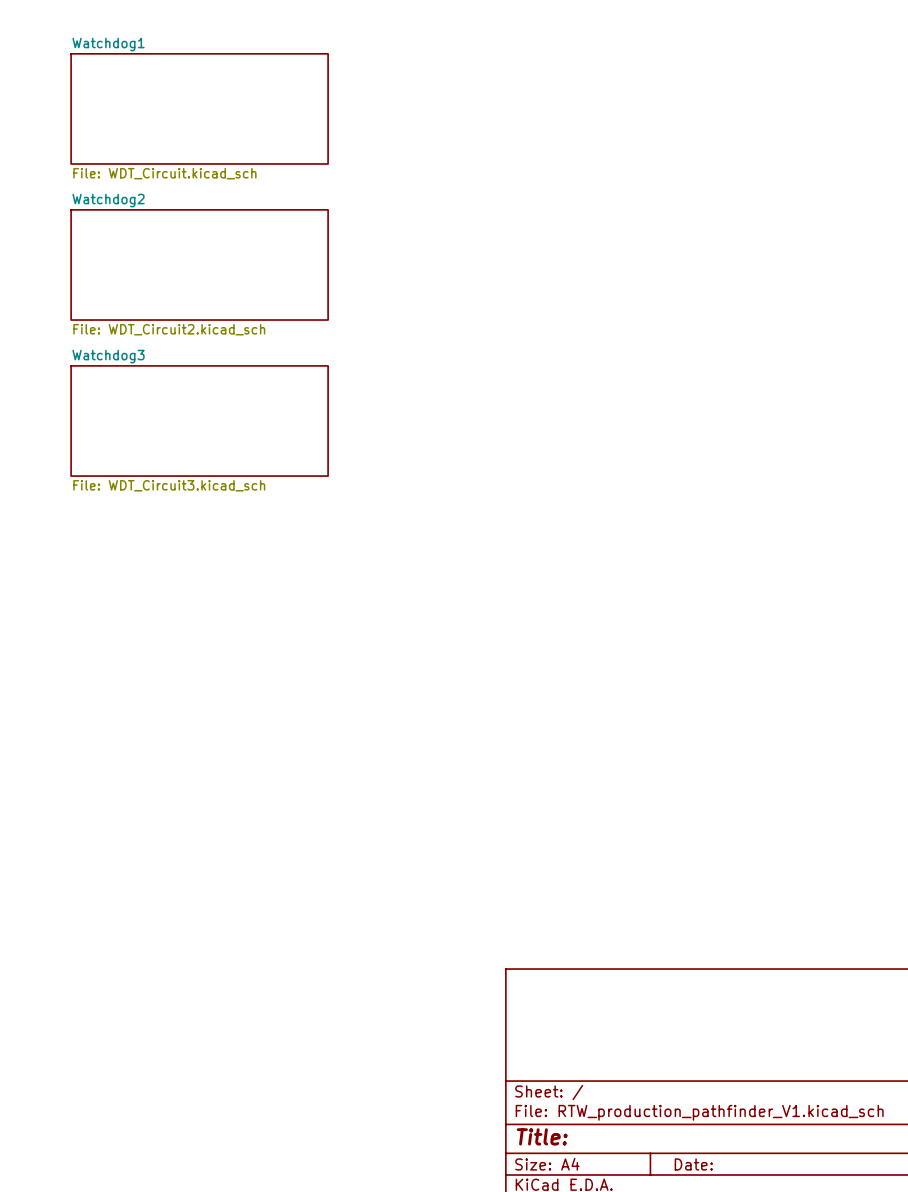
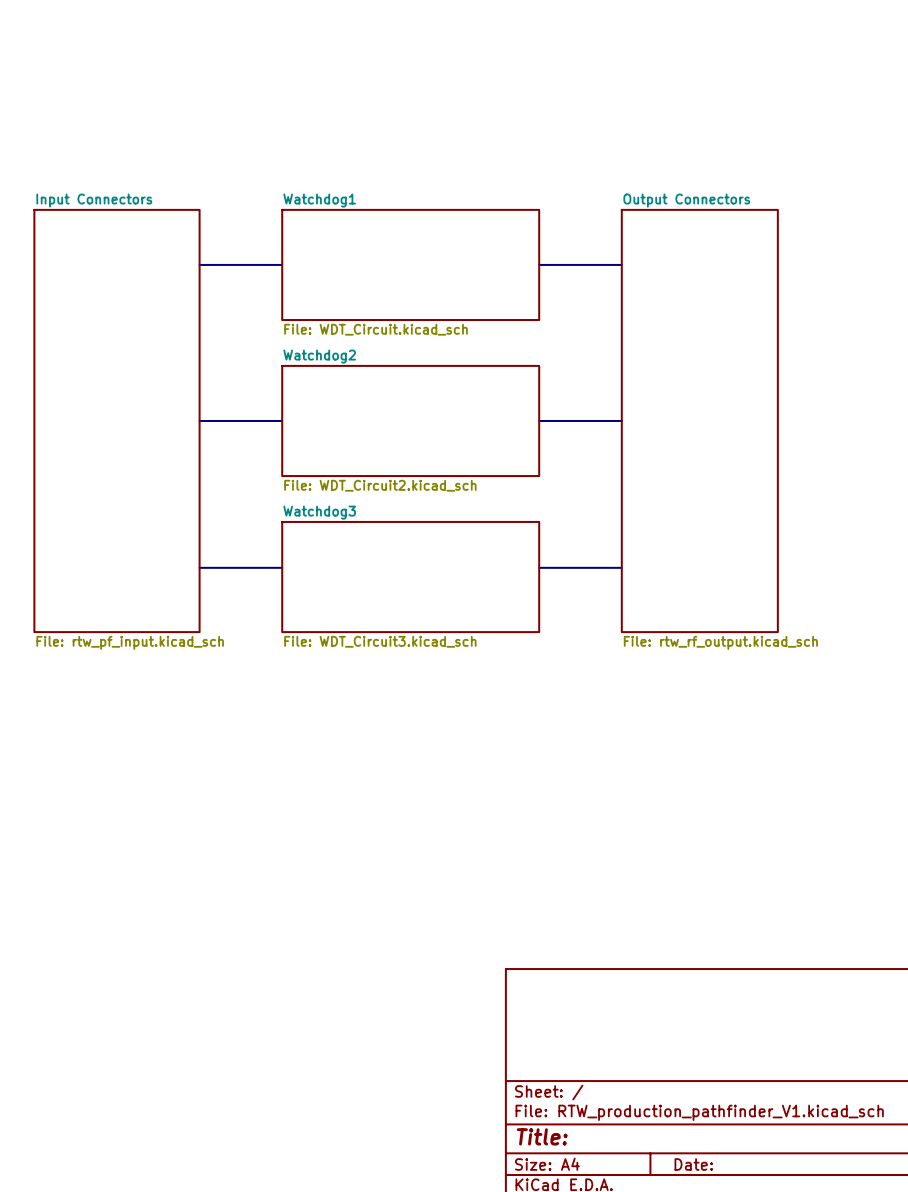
sheet Watchdog1 position: (199, 108) -> (410, 264)
line: none -> (199, 264) (282, 264)
sheet Watchdog2 position: (199, 264) -> (410, 420)
line: none -> (539, 264) (621, 264)
sheet Input Connectors: none -> File: rtw_pf_input.kicad_sch (116, 420)
line: none -> (199, 420) (282, 420)
sheet Watchdog3 position: (199, 420) -> (410, 577)
line: none -> (539, 420) (621, 420)
sheet Output Connectors: none -> File: rtw_rf_output.kicad_sch (699, 420)
line: none -> (199, 567) (282, 567)
line: none -> (539, 567) (621, 567)

